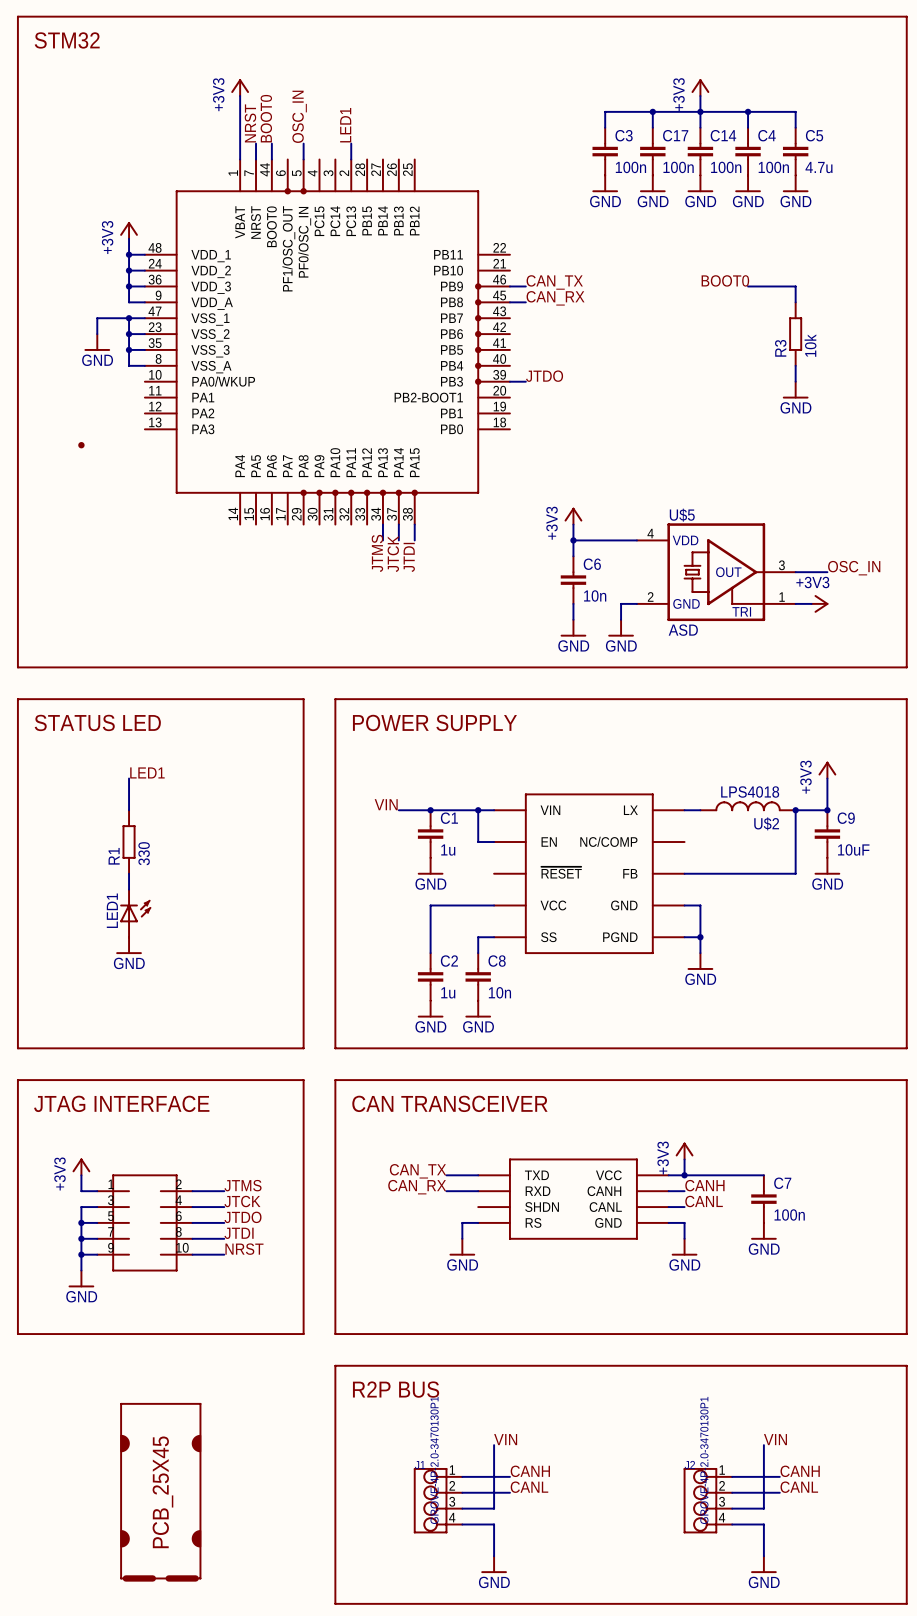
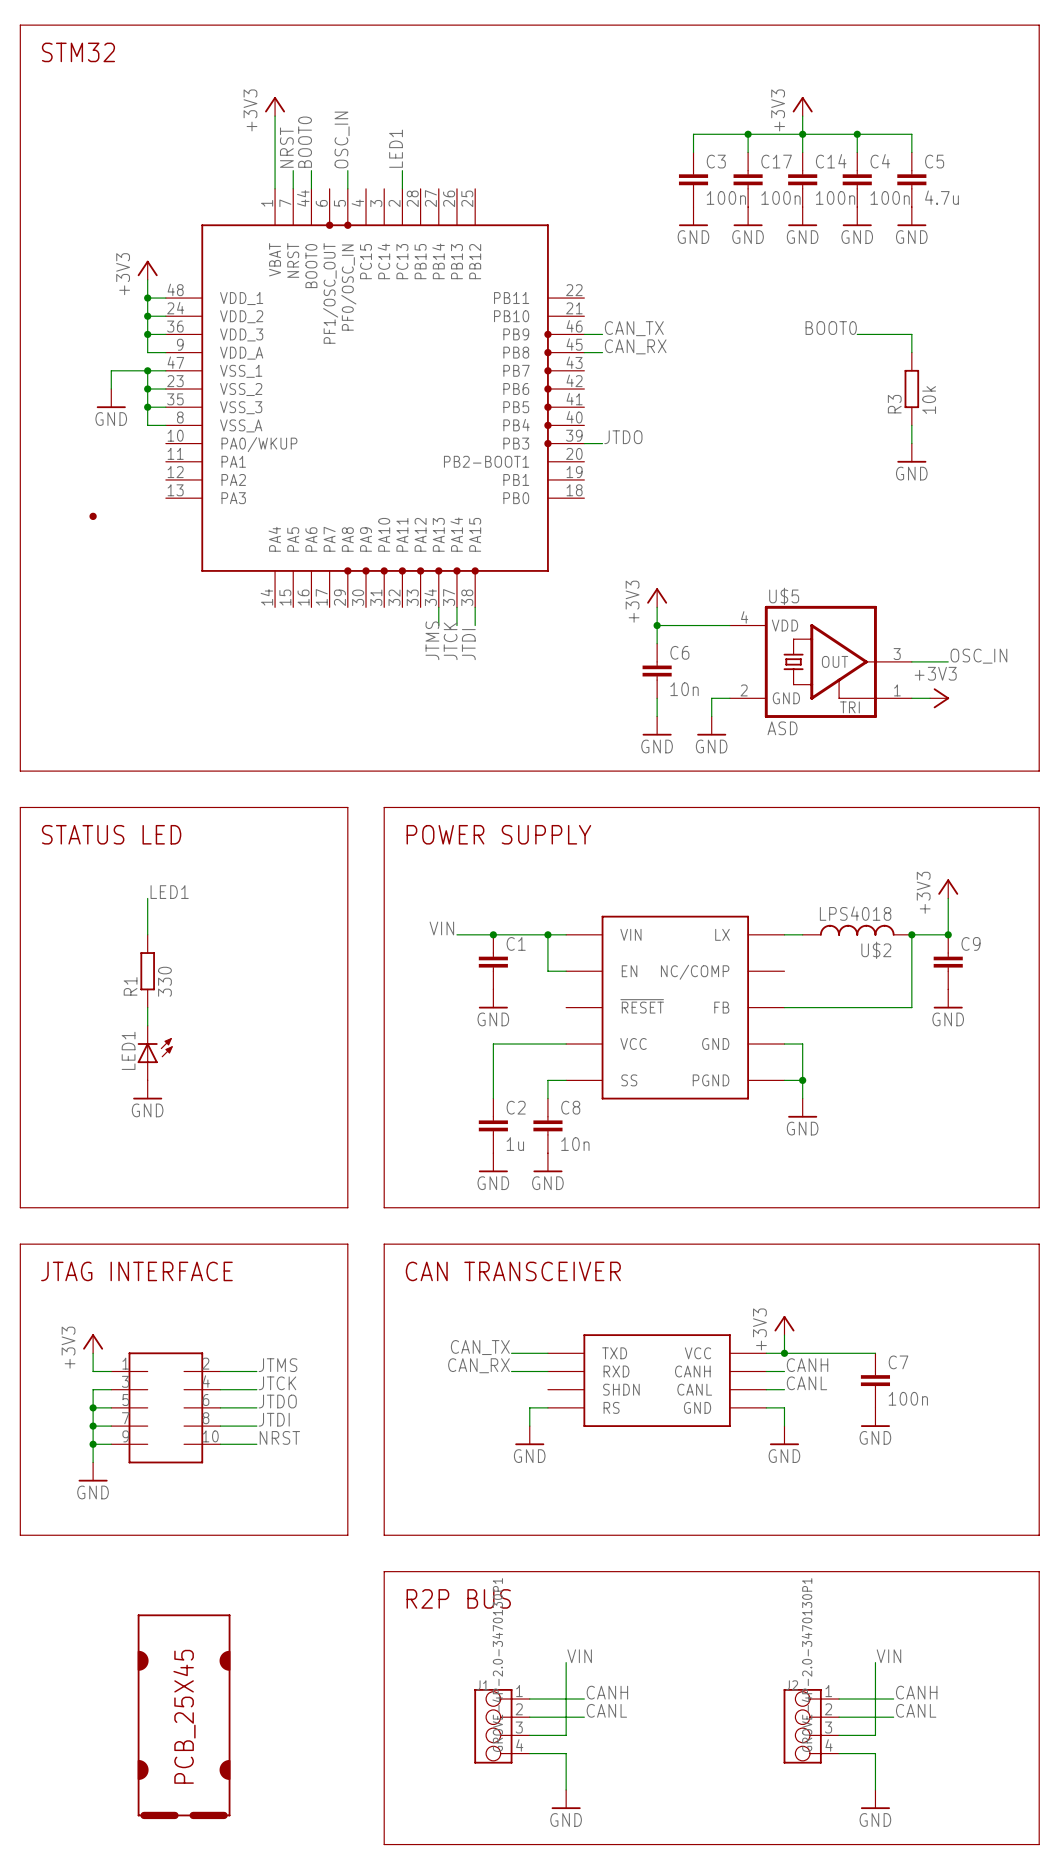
C9 value: 10uF (853, 849) -> none
C1 value: 1u (448, 850) -> none

